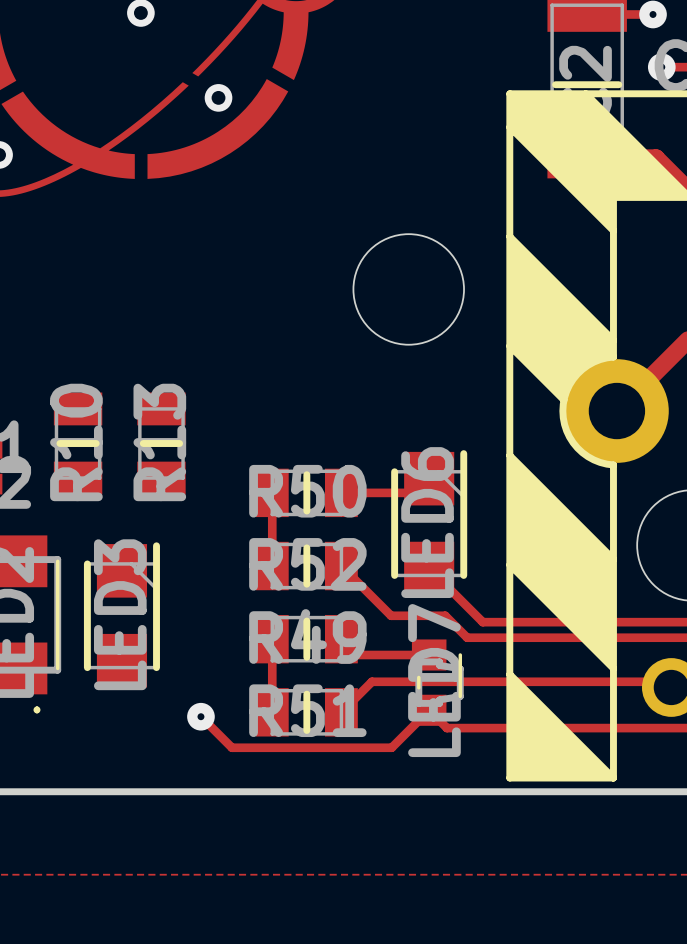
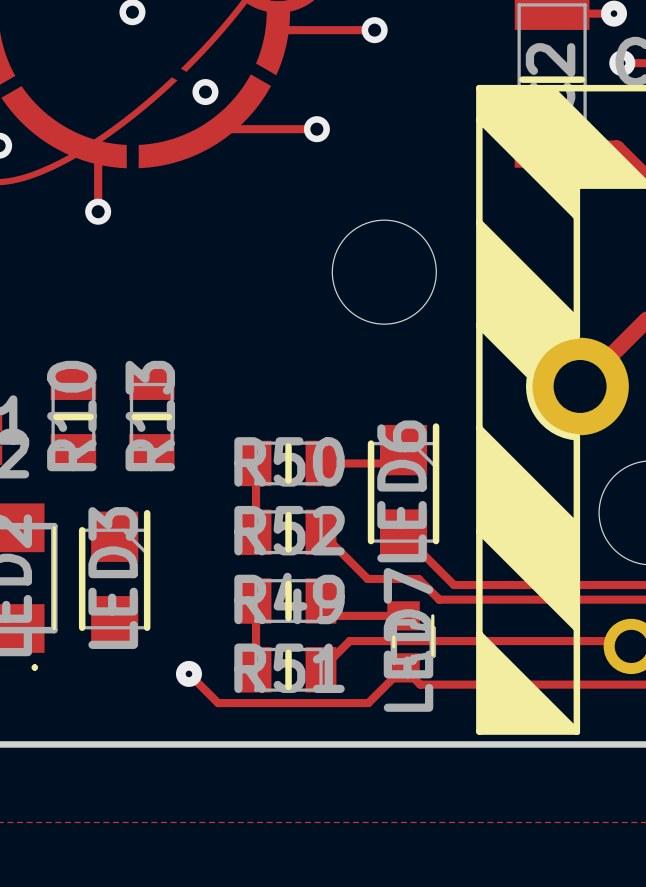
track: none -> (275, 30) (374, 30)
via: none -> (374, 30)
track: none -> (213, 129) (316, 129)
via: none -> (316, 129)
track: none -> (98, 150) (98, 211)
via: none -> (98, 211)

